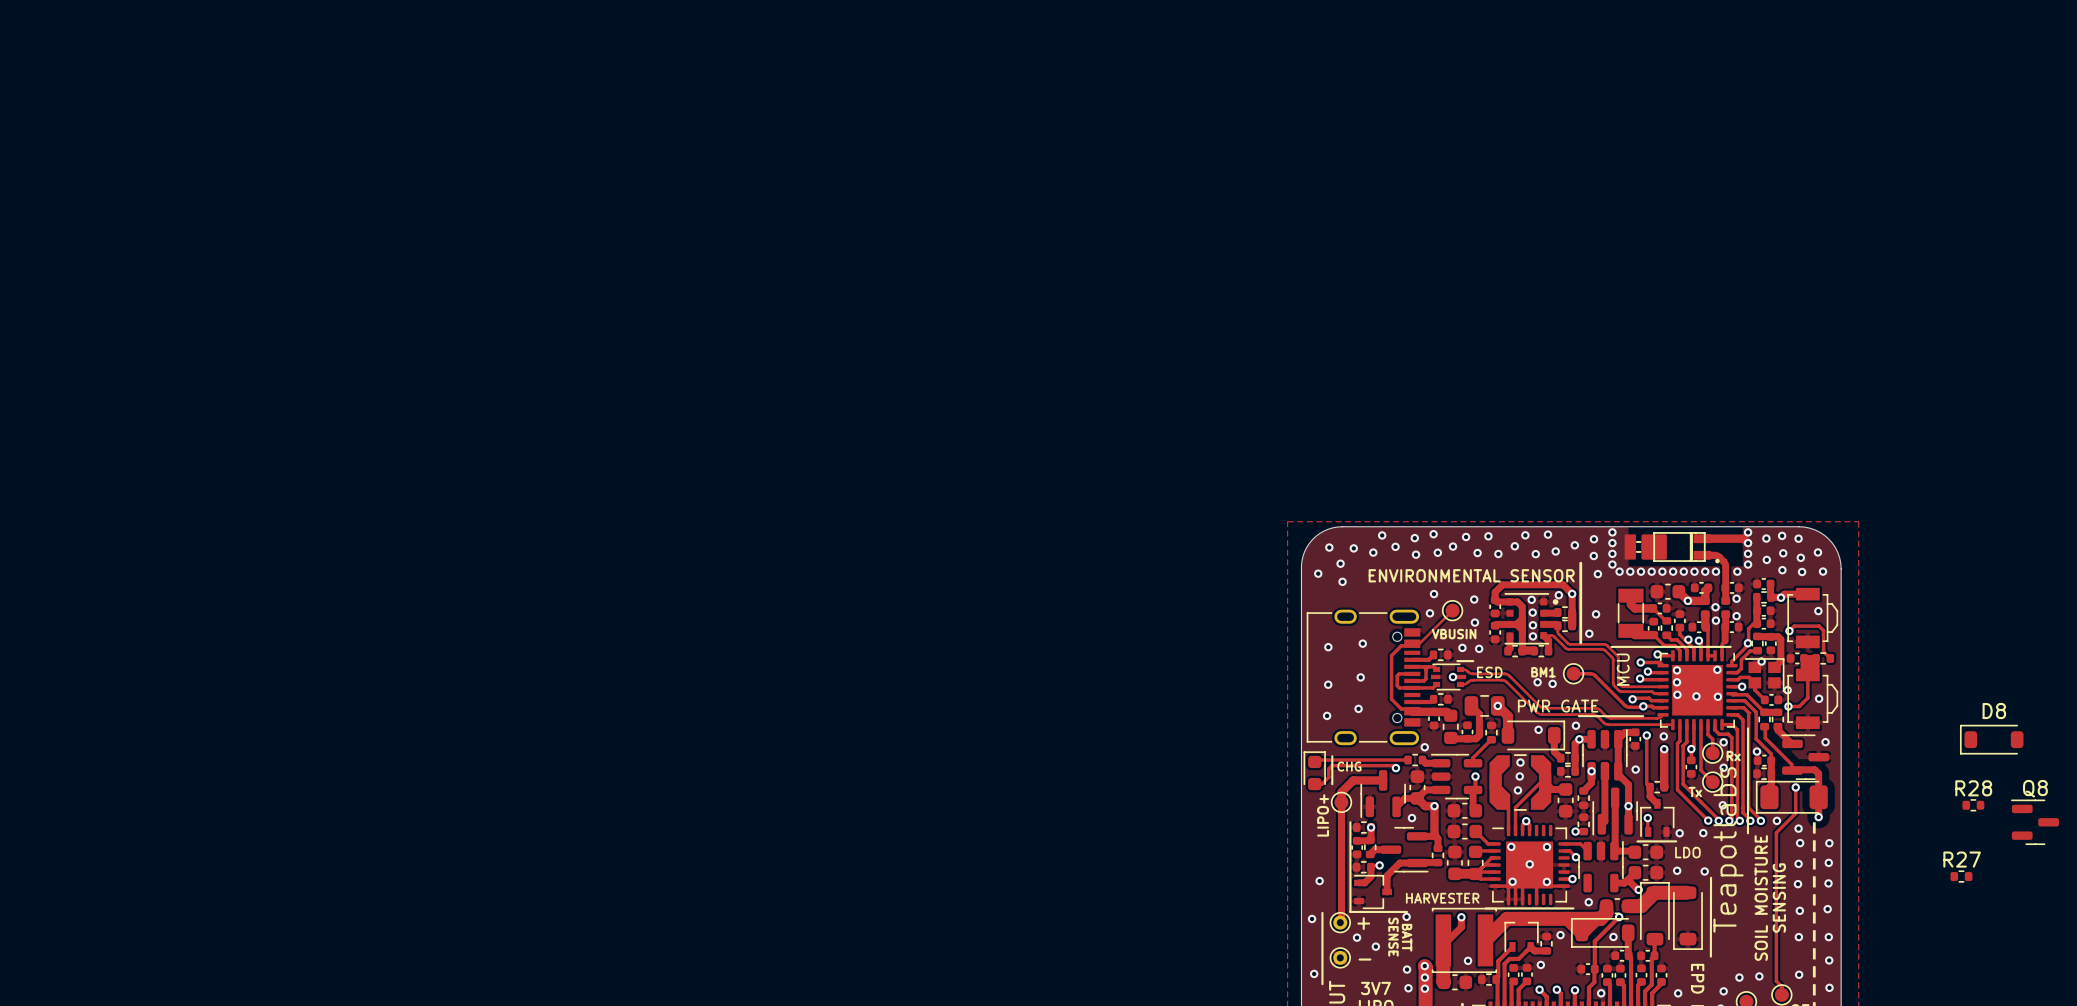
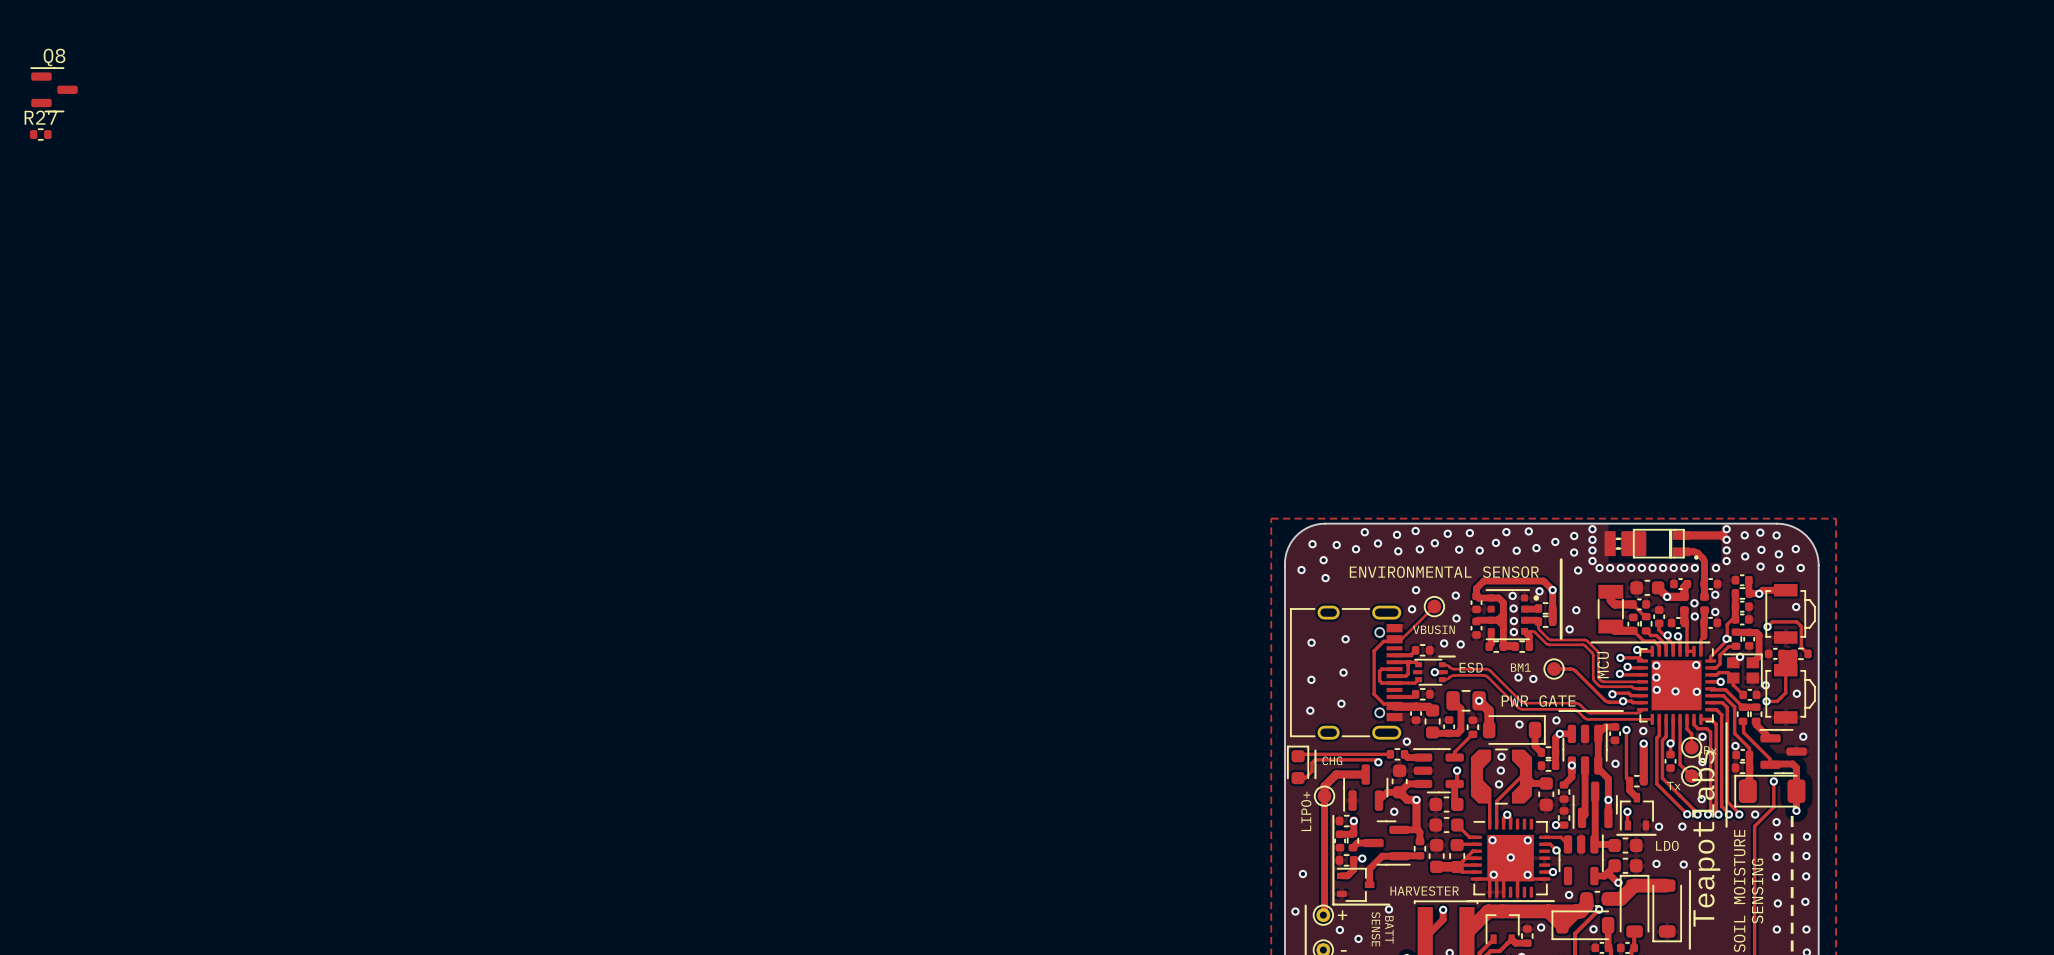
D8: (1991, 739) -> none
R28: (1973, 805) -> none
Q8 position: (2034, 822) -> (54, 89)
R27 position: (1961, 876) -> (40, 134)

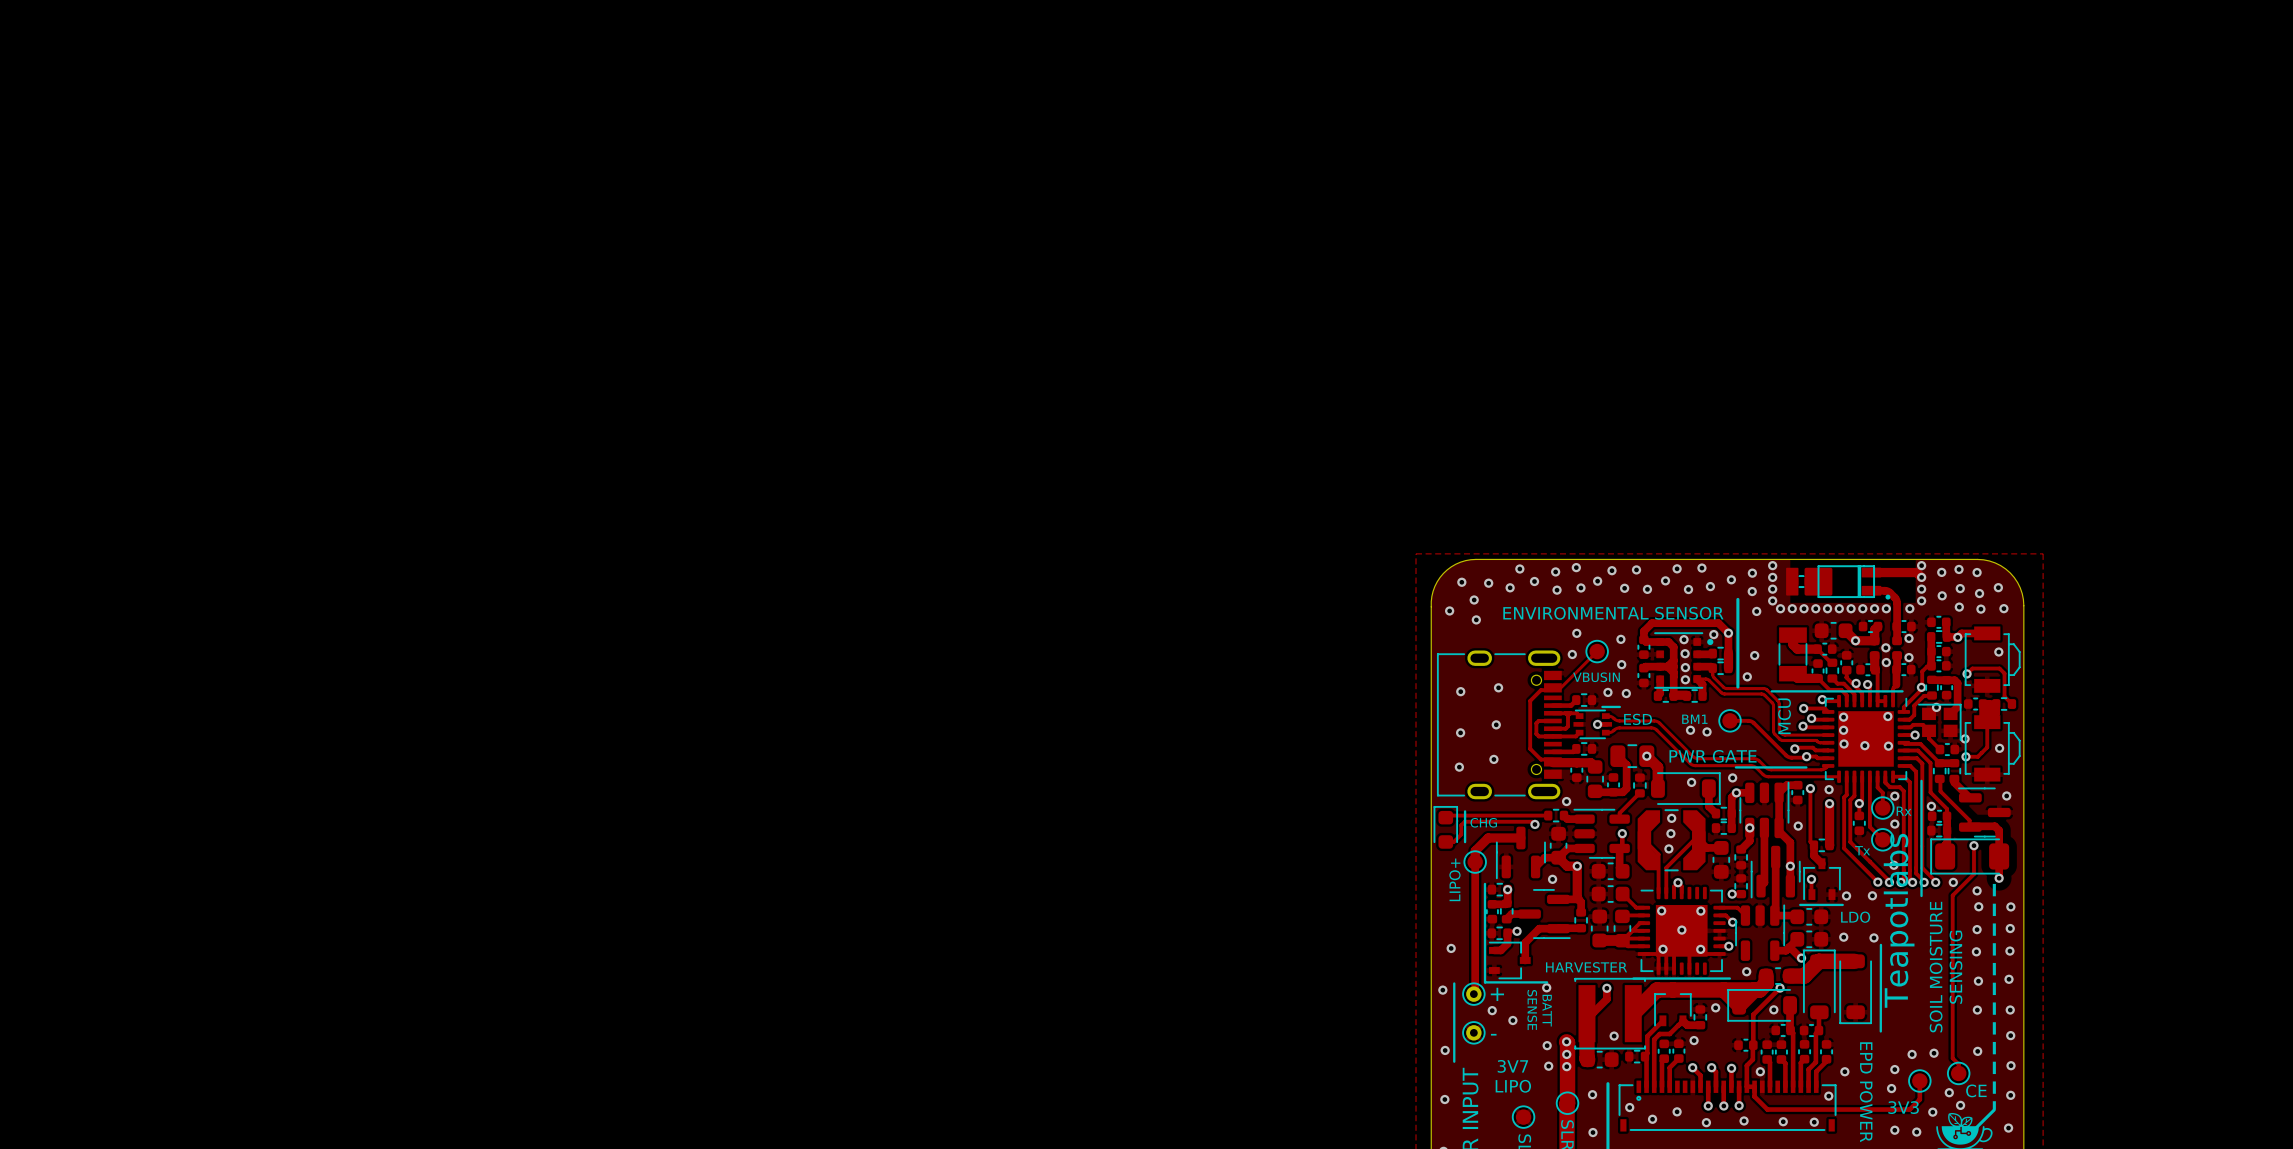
Q8: (54, 89) -> none
R27: (40, 134) -> none

